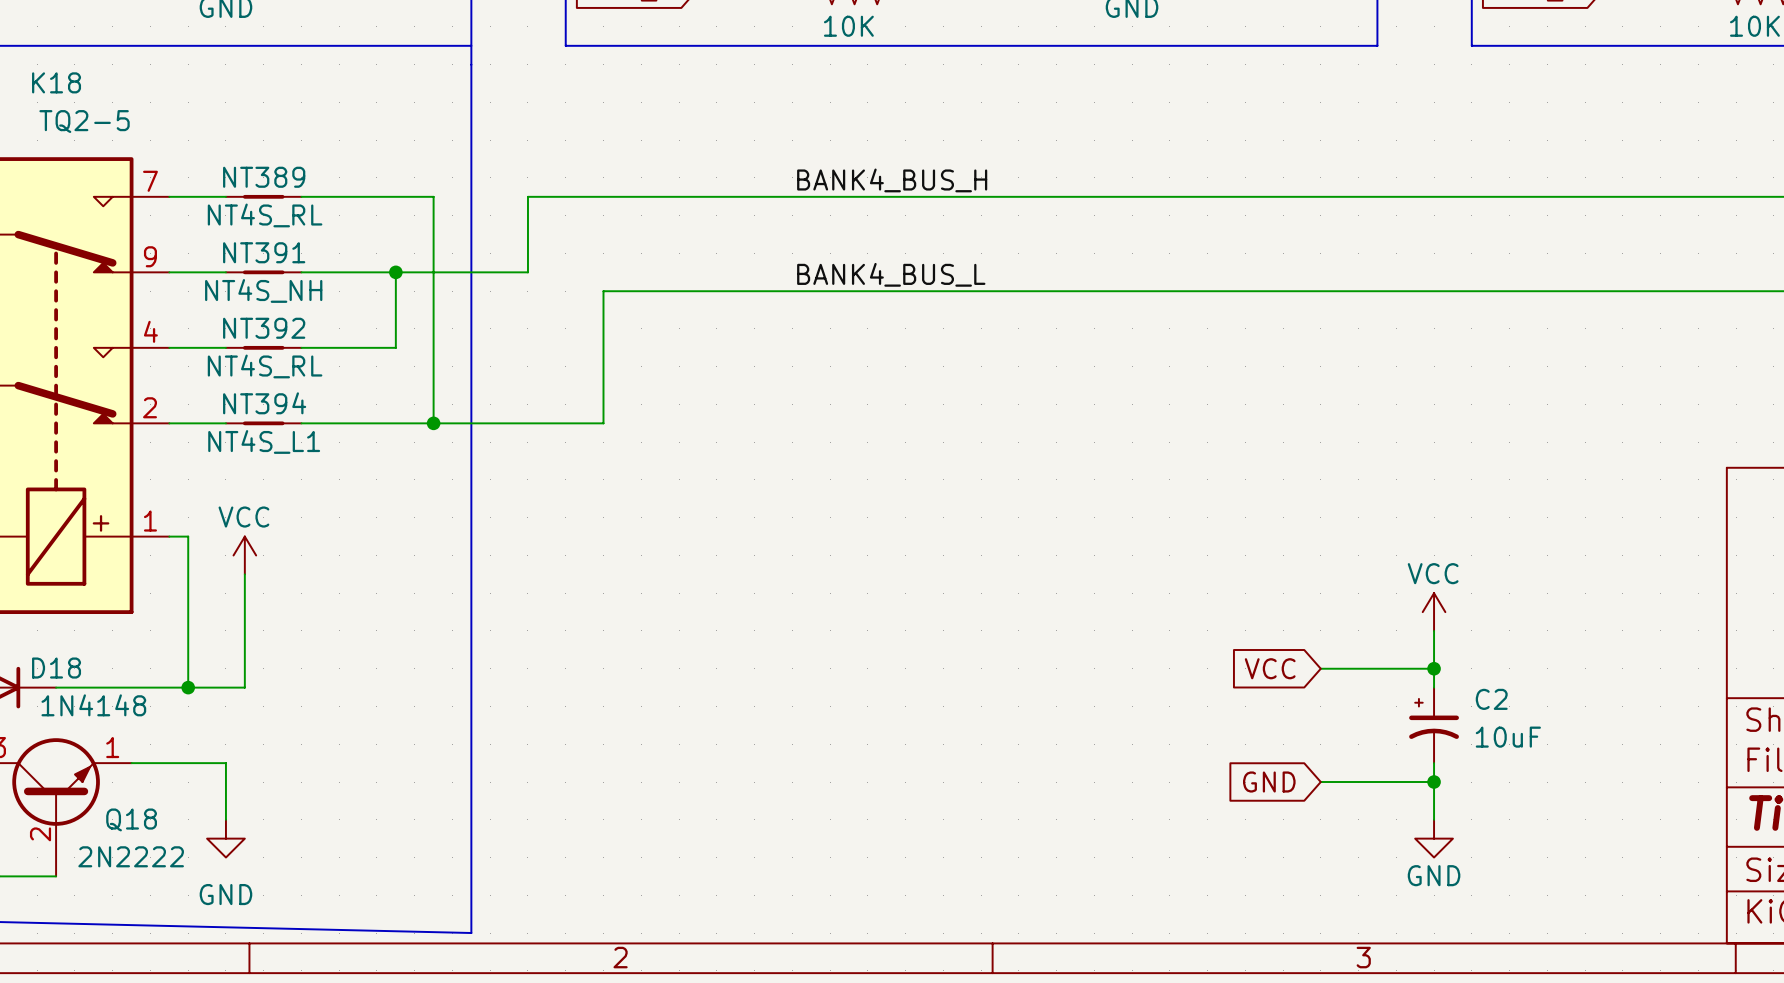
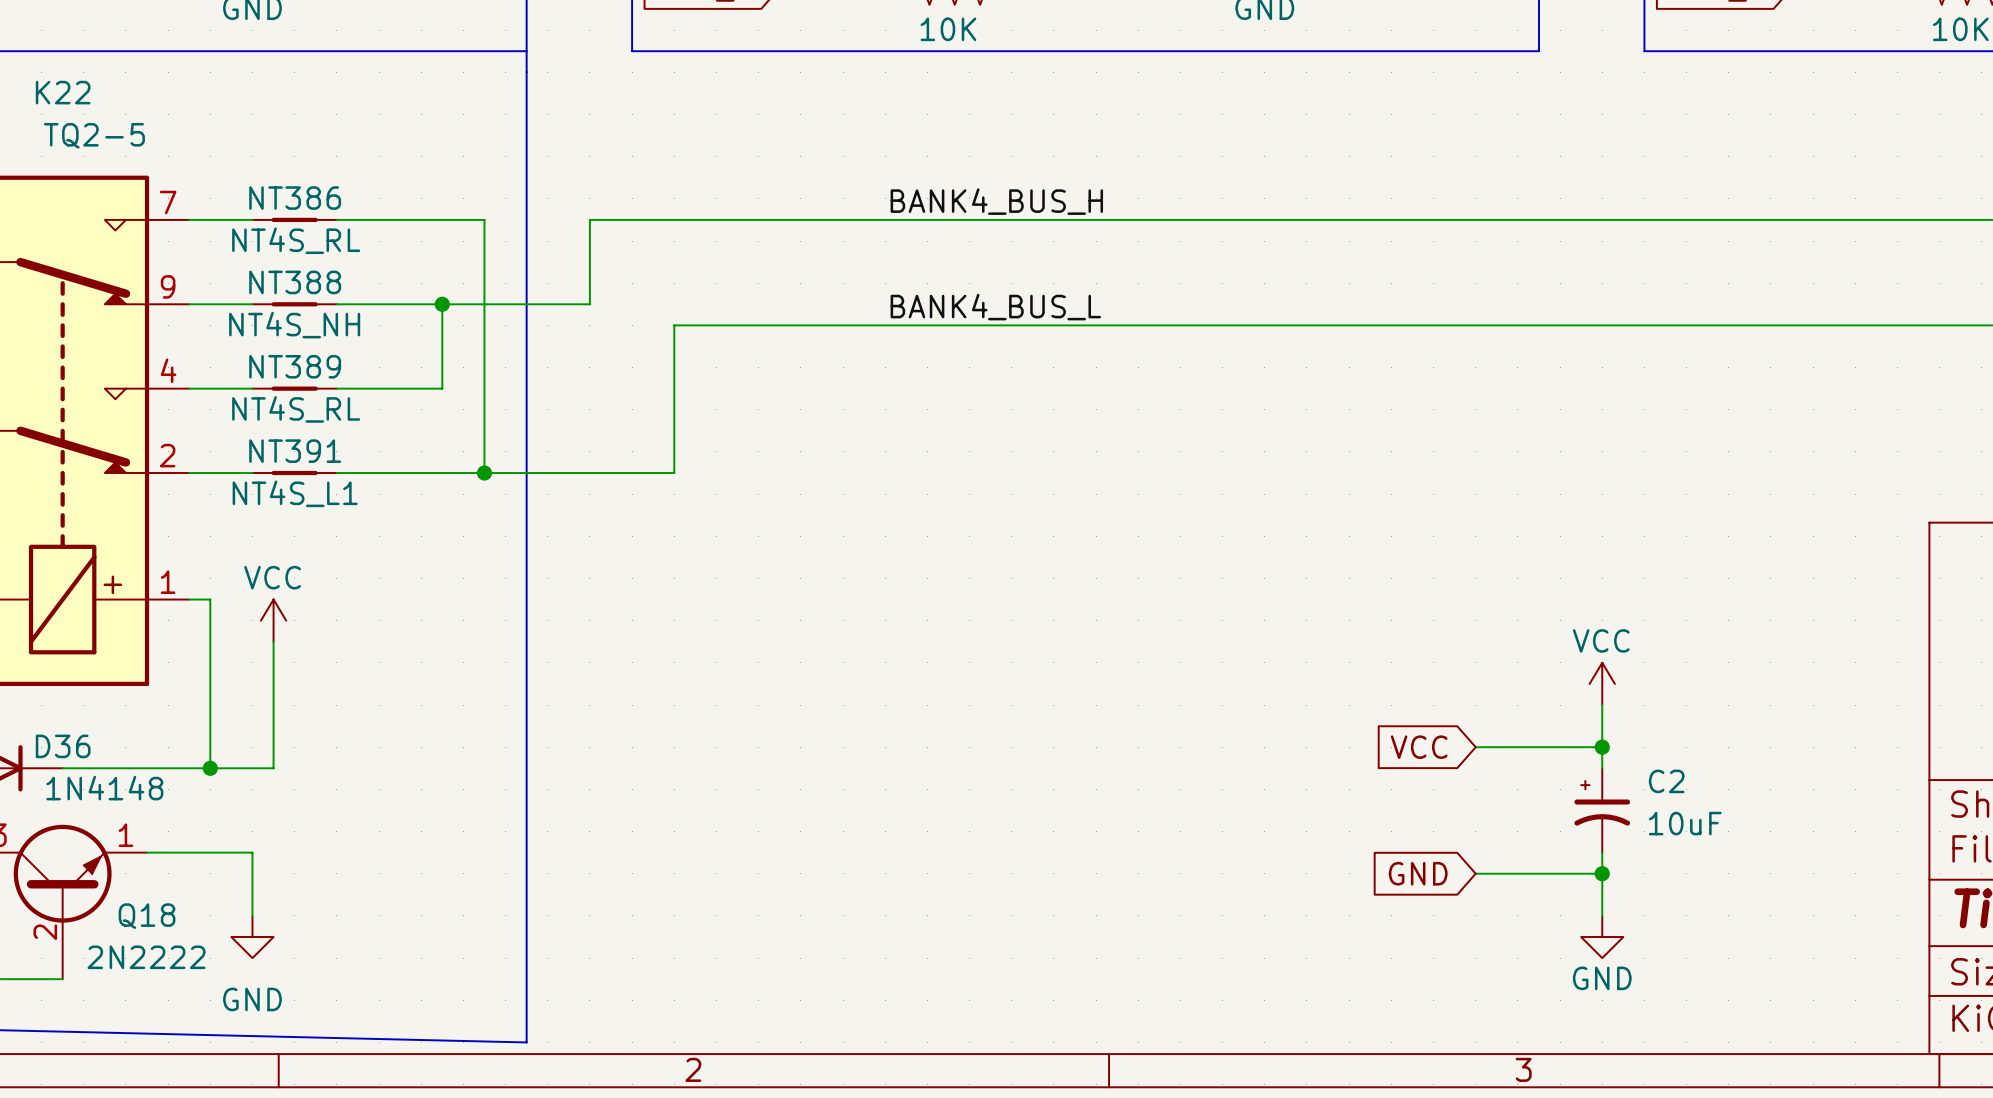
K18 name: K18 (56, 82) -> K22 (63, 92)
NT389 name: NT389 (264, 177) -> NT386 (295, 198)
NT391 name: NT391 (264, 252) -> NT388 (295, 282)
NT392 name: NT392 (264, 328) -> NT389 (295, 366)
NT394 name: NT394 (264, 403) -> NT391 (295, 451)
D18 name: D18 (56, 668) -> D36 (63, 746)

